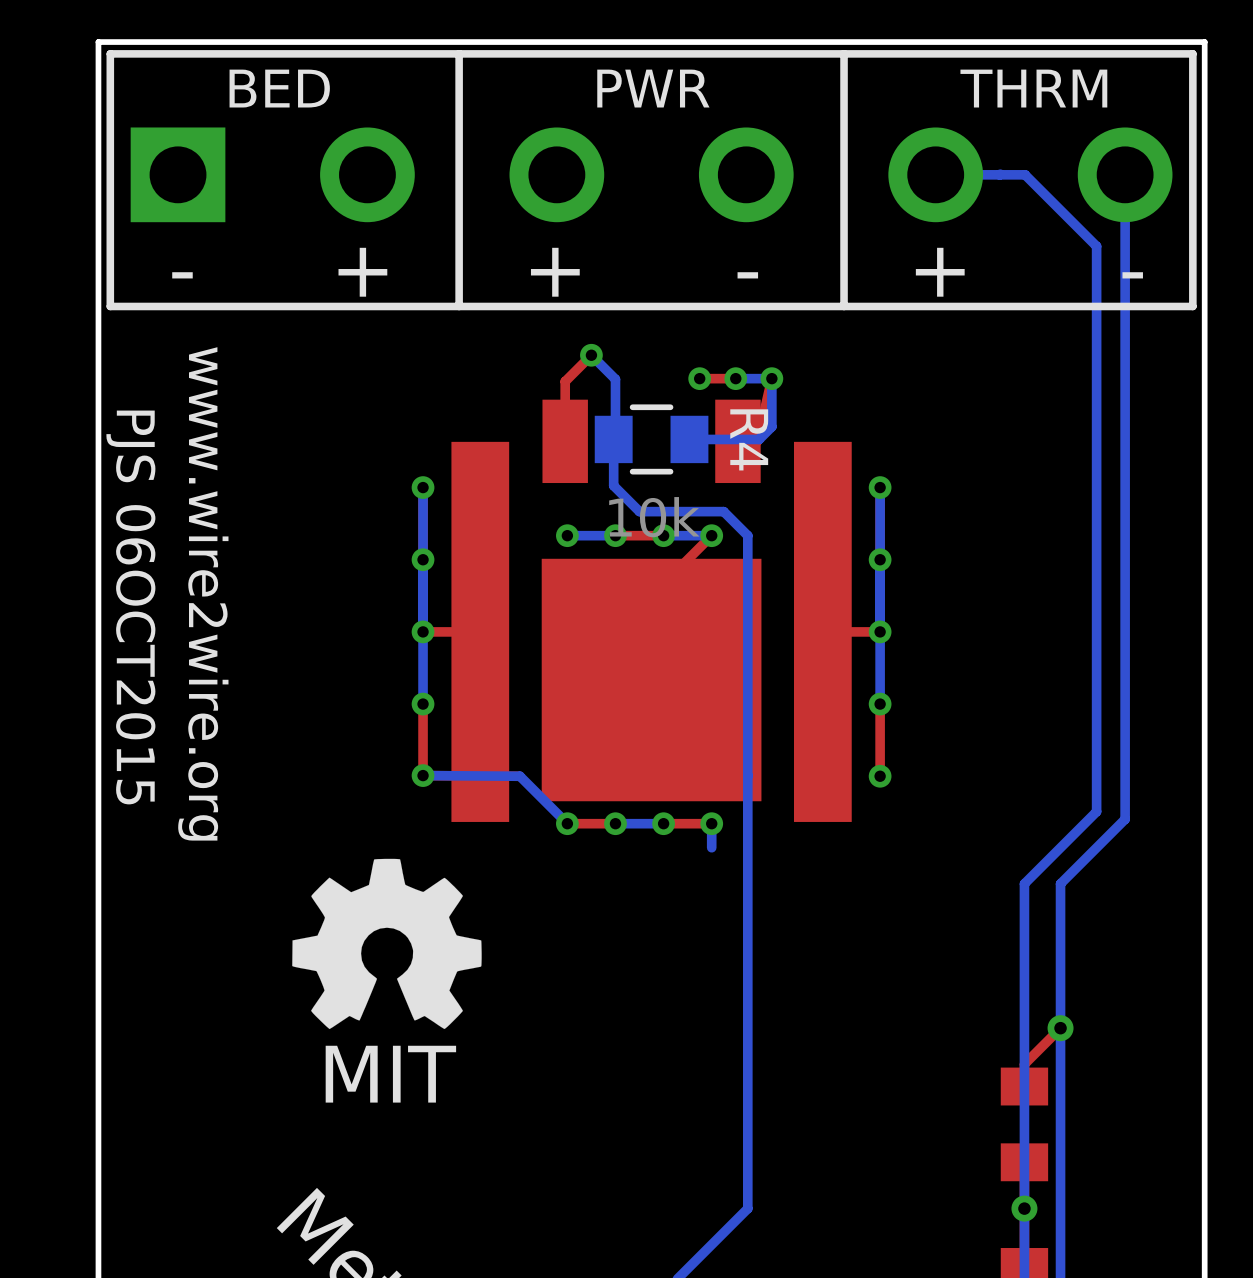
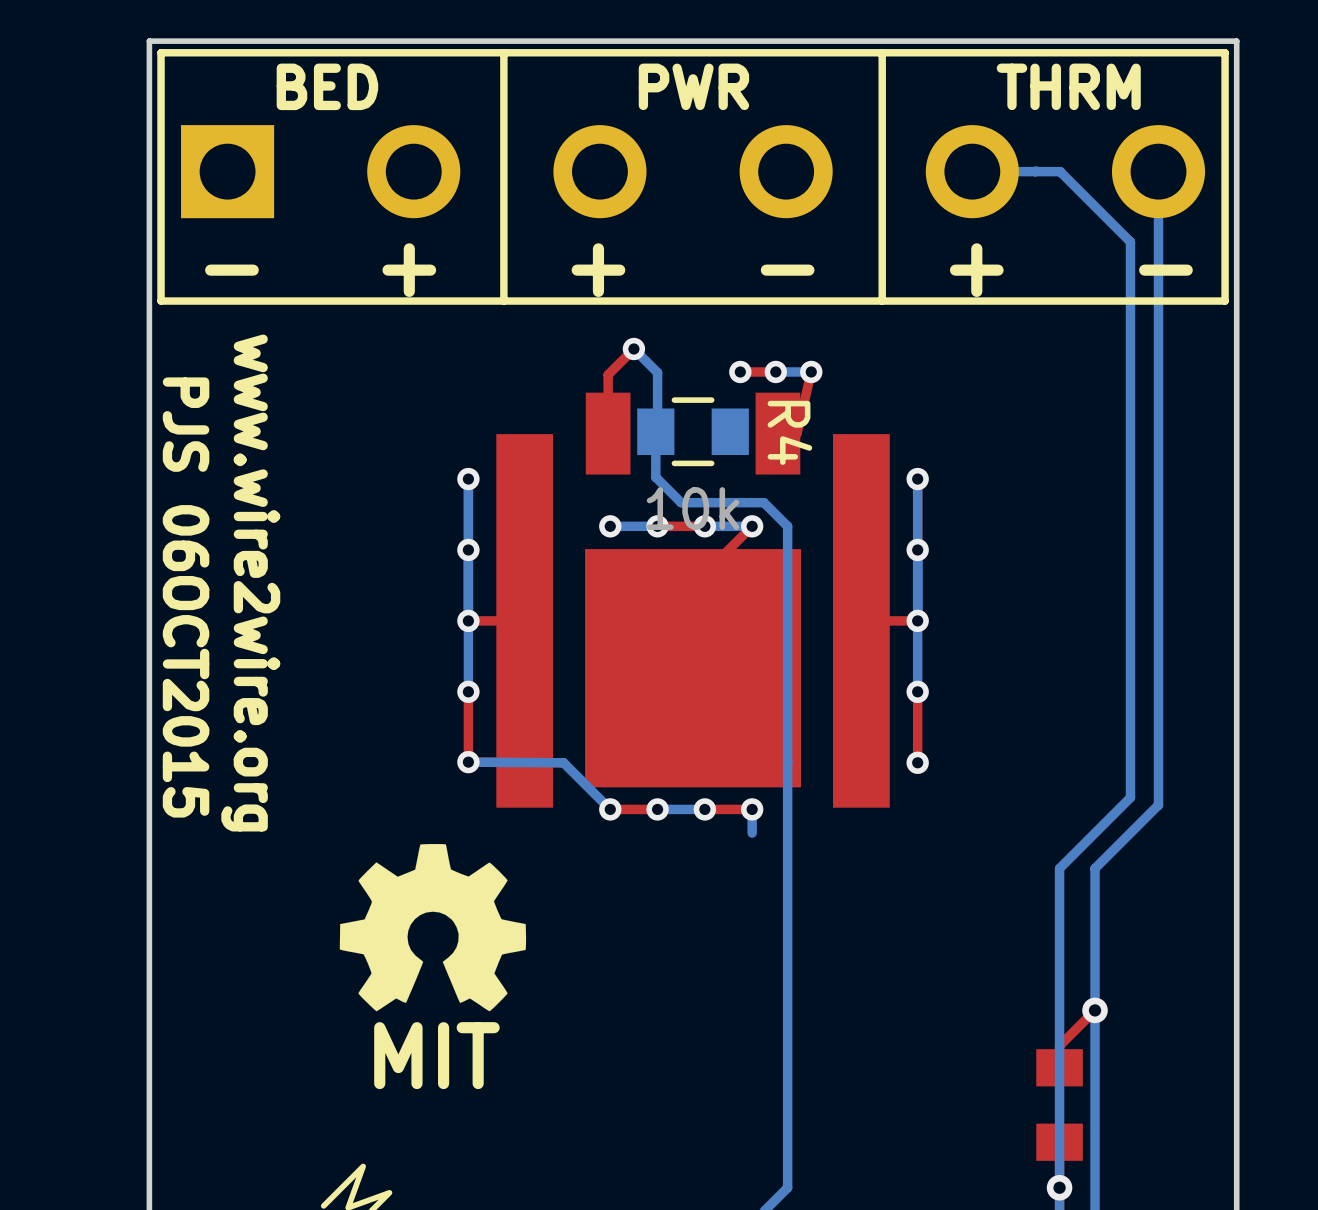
bottom track: (771, 378) (771, 426) (759, 439) (689, 439) -> none

